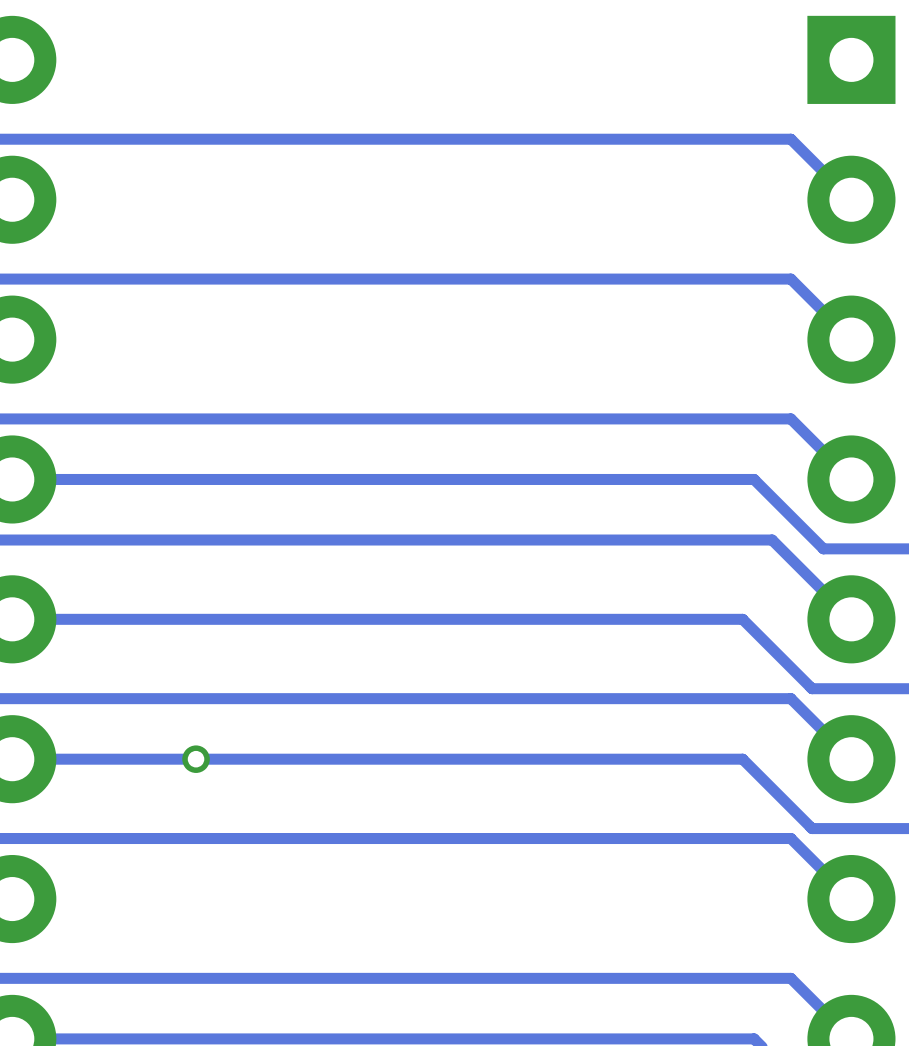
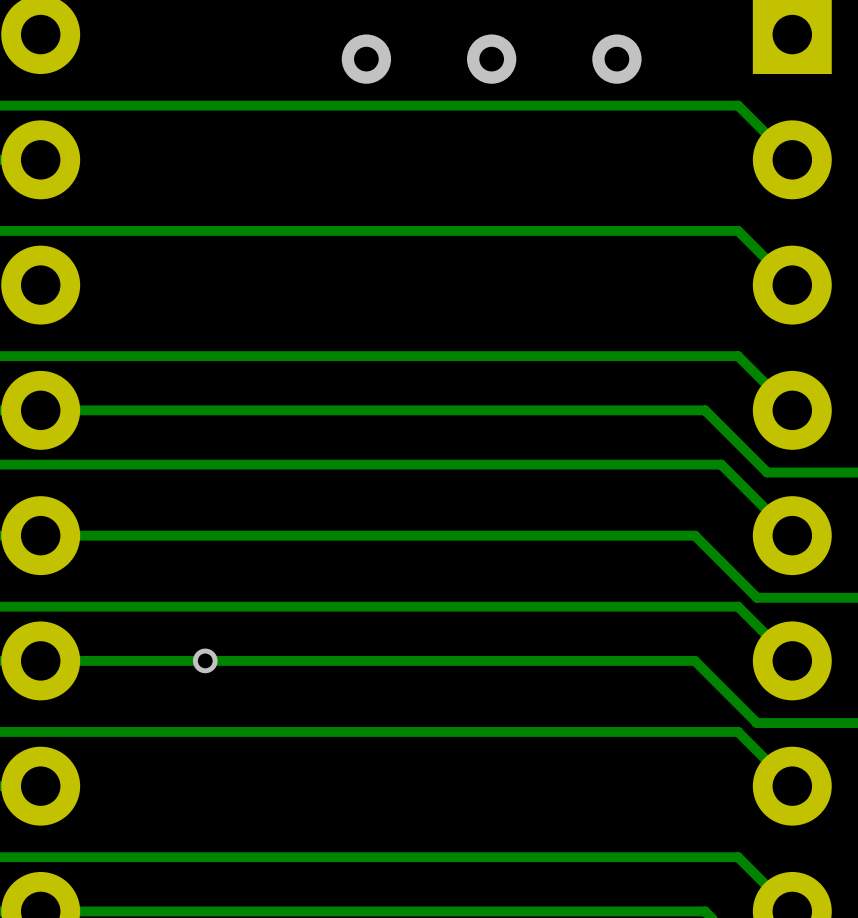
via: none -> (366, 59)
via: none -> (491, 59)
via: none -> (616, 59)

